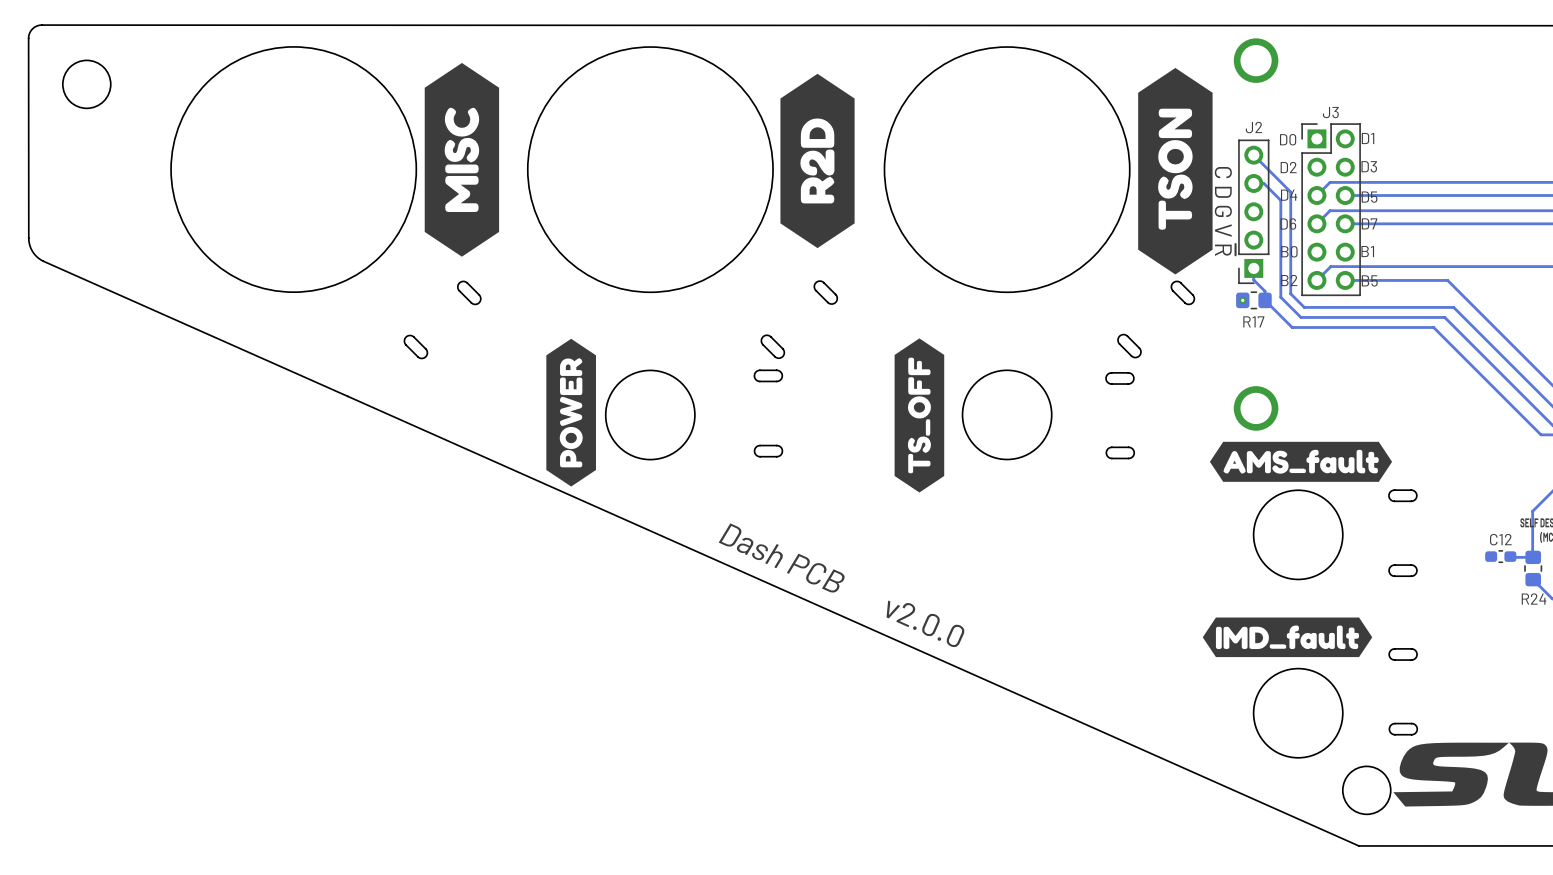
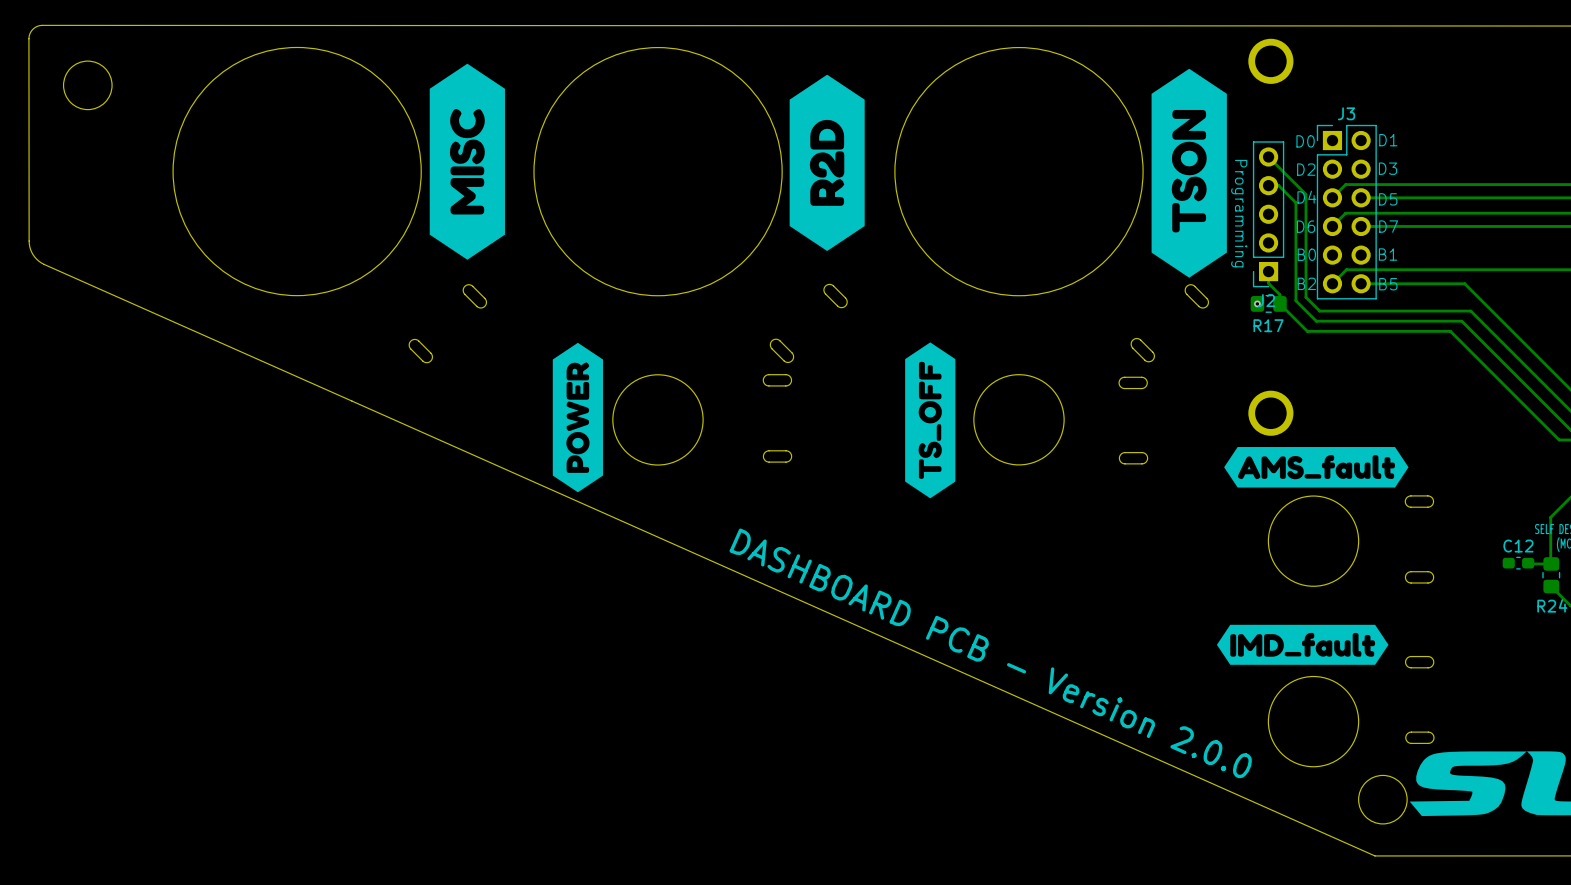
J2 name position: J2 (1253, 127) -> J2 (1266, 300)
text: C D G V ~{R} (1225, 211) -> Programming (1239, 213)
text: Dash PCB (781, 558) -> DASHBOARD PCB - Version 2.0.0 (990, 653)
text: v2.0.0 (925, 624) -> none

